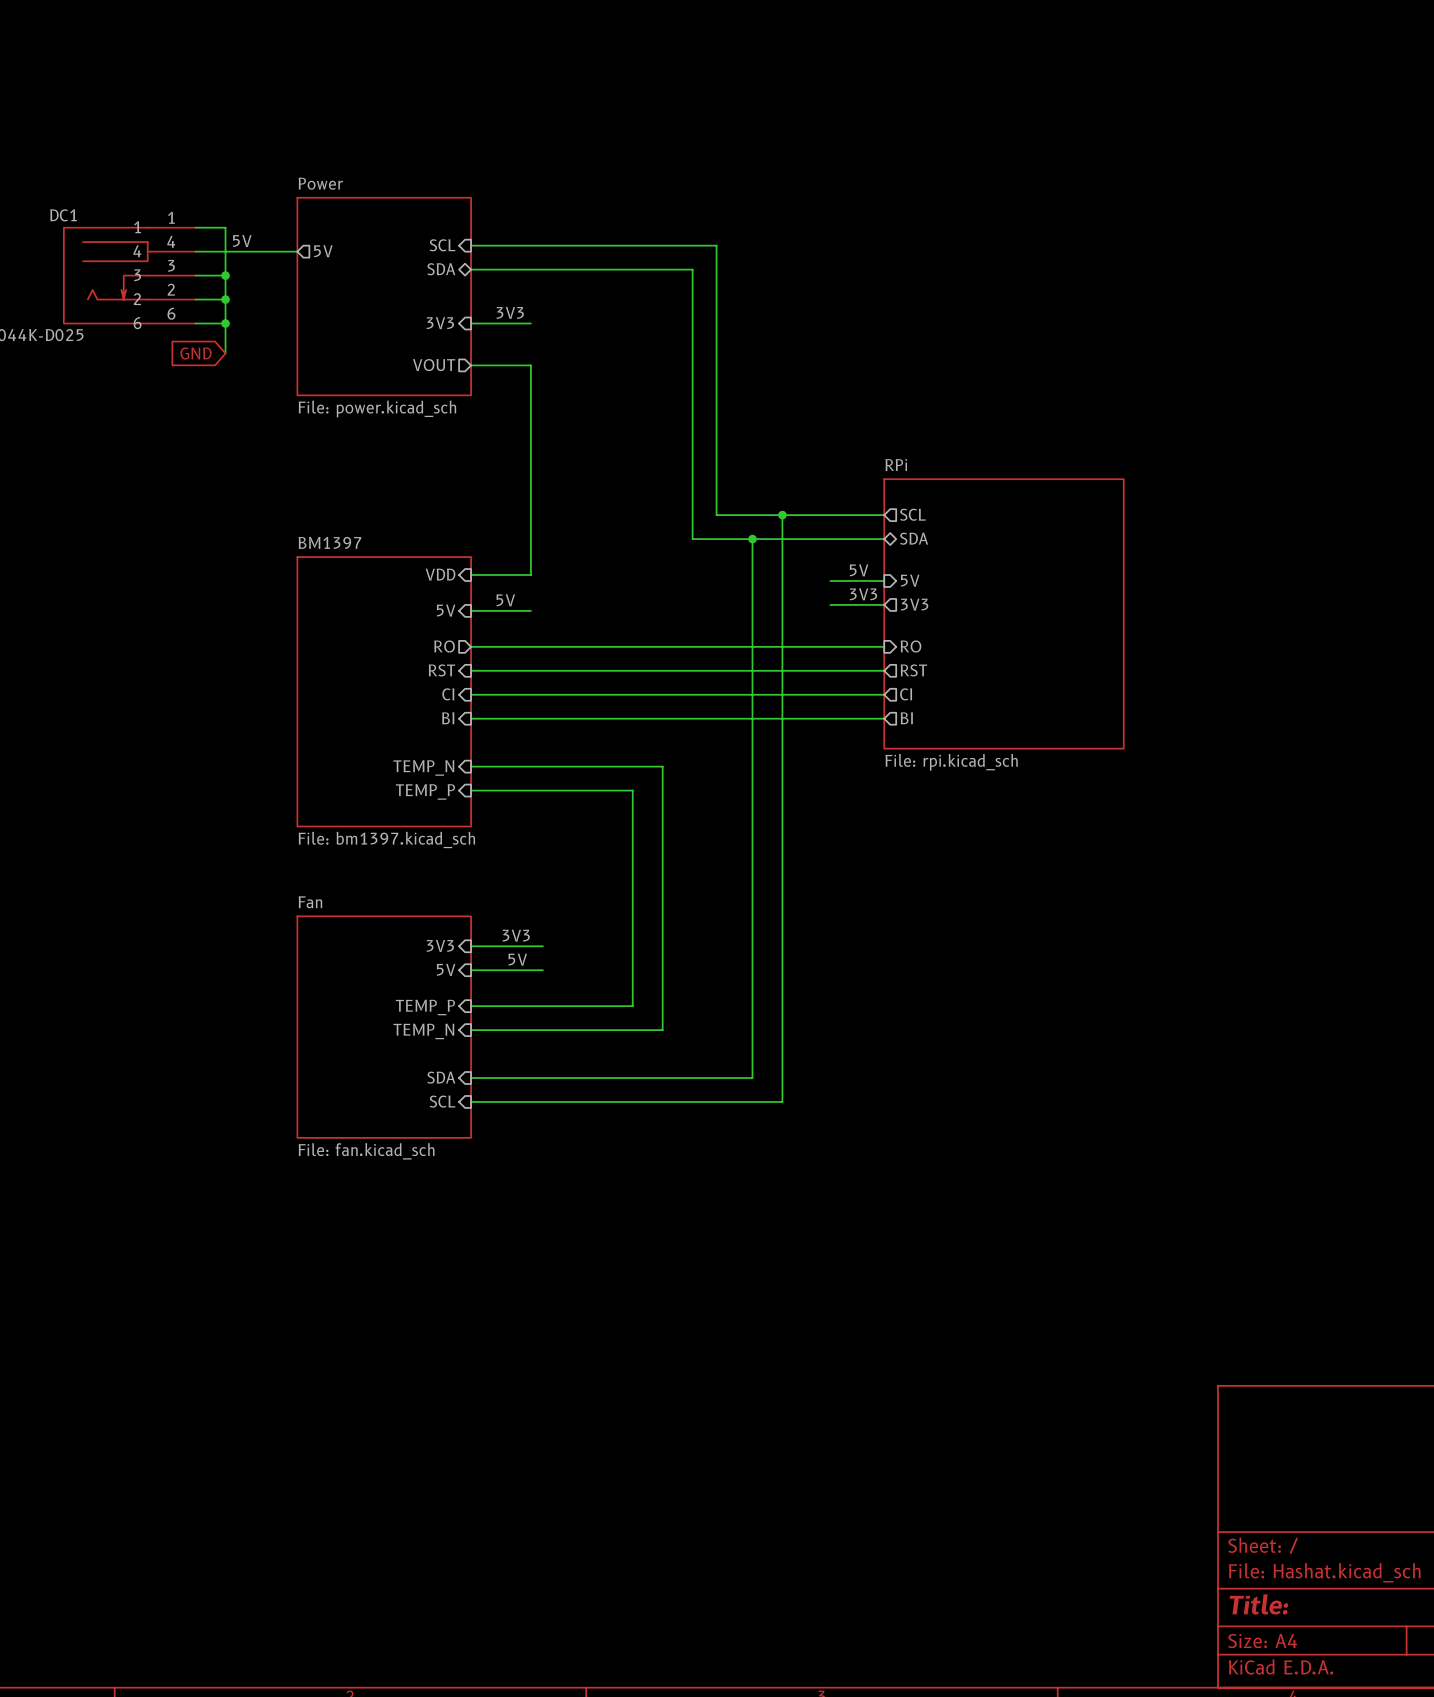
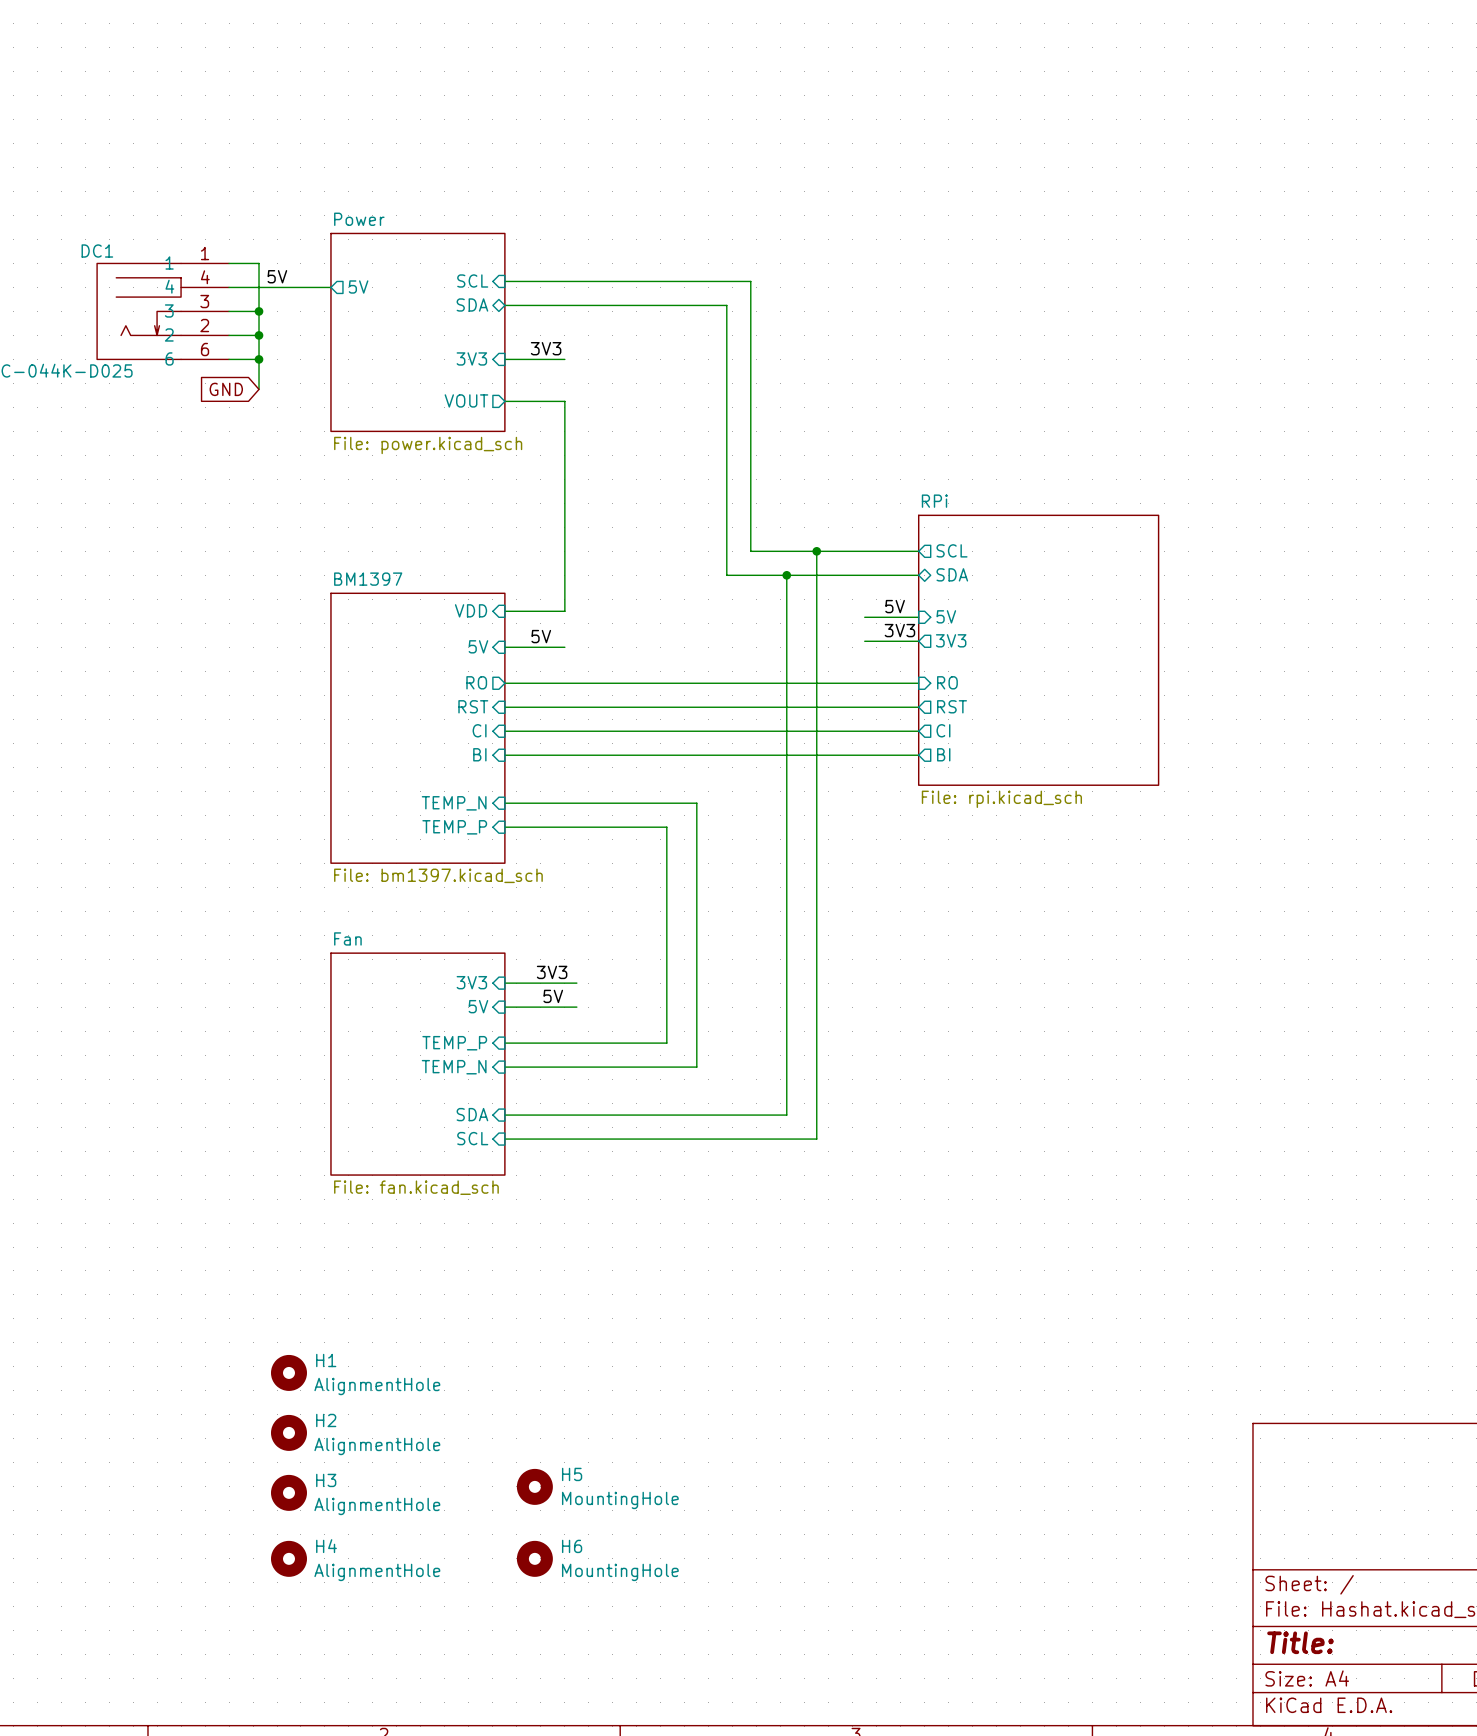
H1: none -> AlignmentHole (288, 1372)
H2: none -> AlignmentHole (288, 1432)
H5: none -> MountingHole (534, 1486)
H3: none -> AlignmentHole (288, 1492)
H4: none -> AlignmentHole (288, 1558)
H6: none -> MountingHole (534, 1558)

